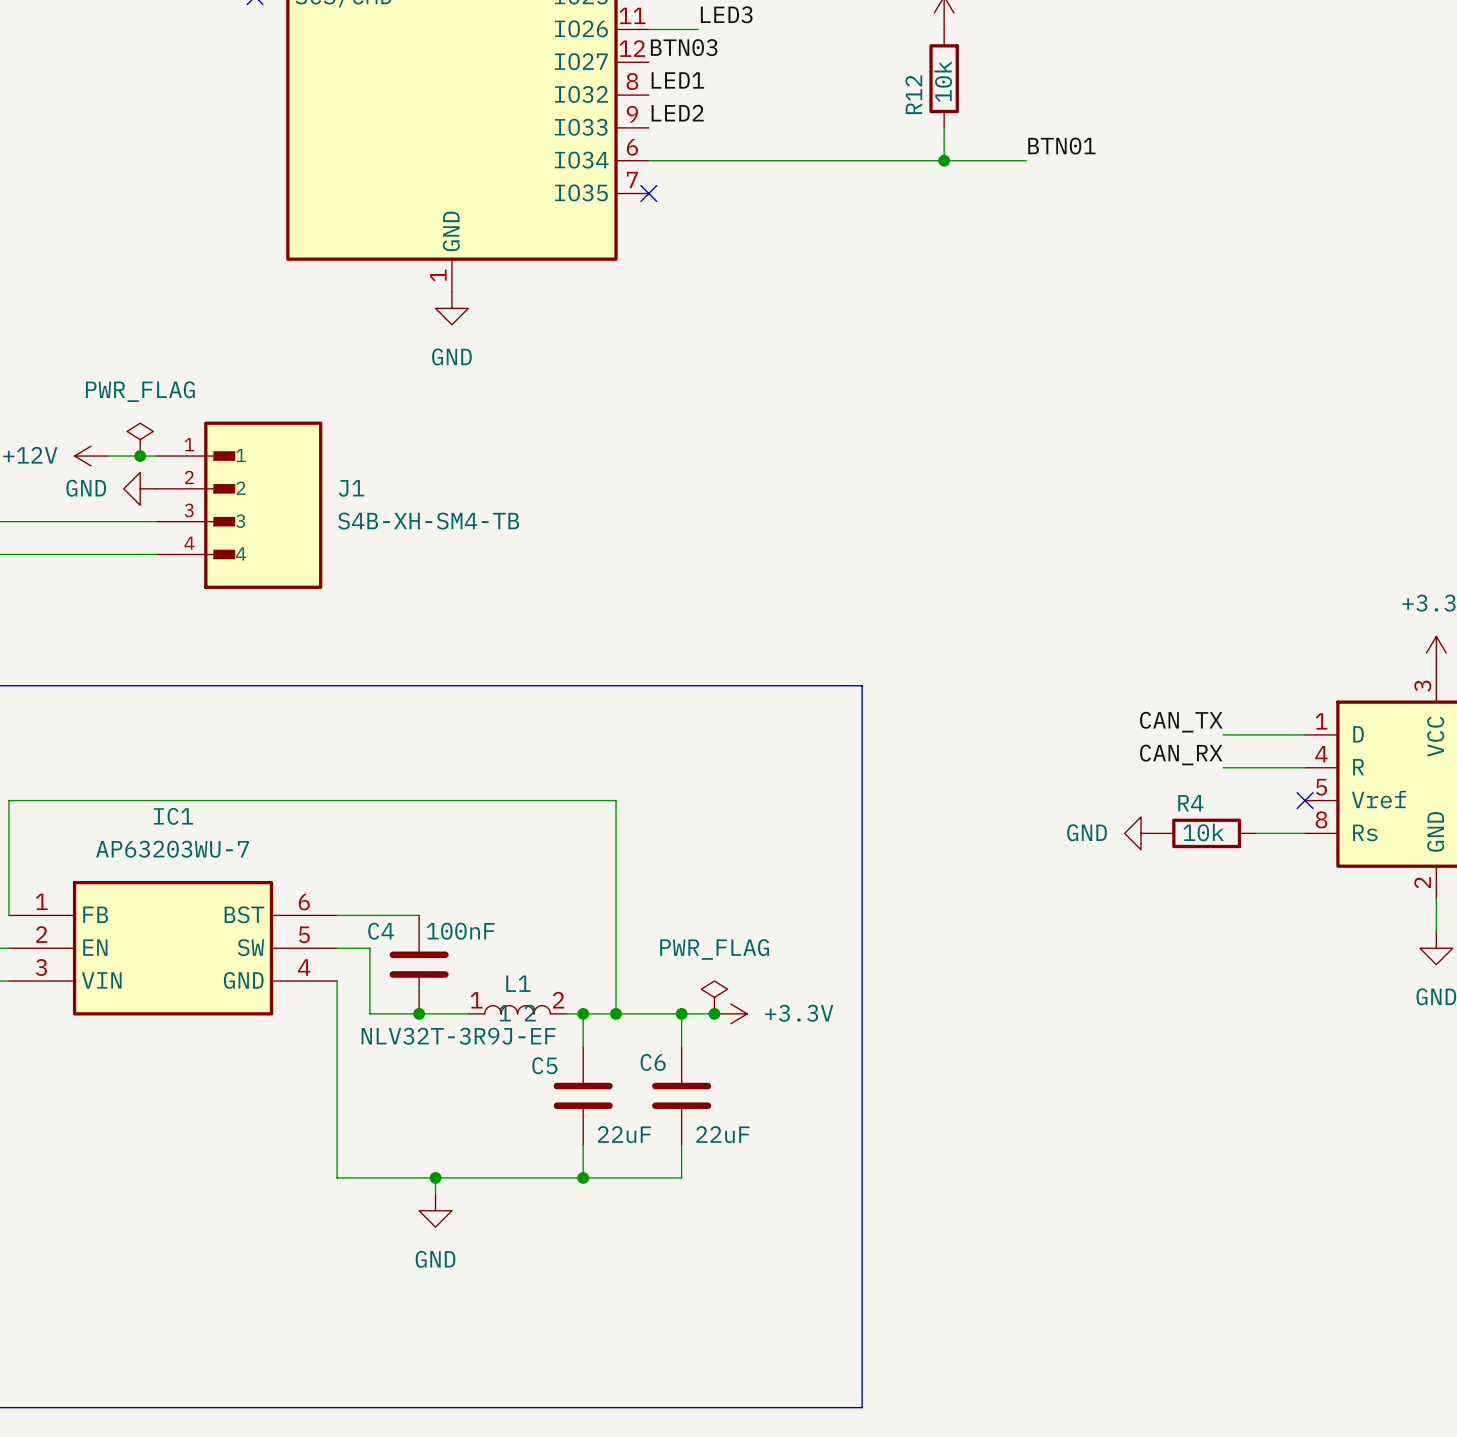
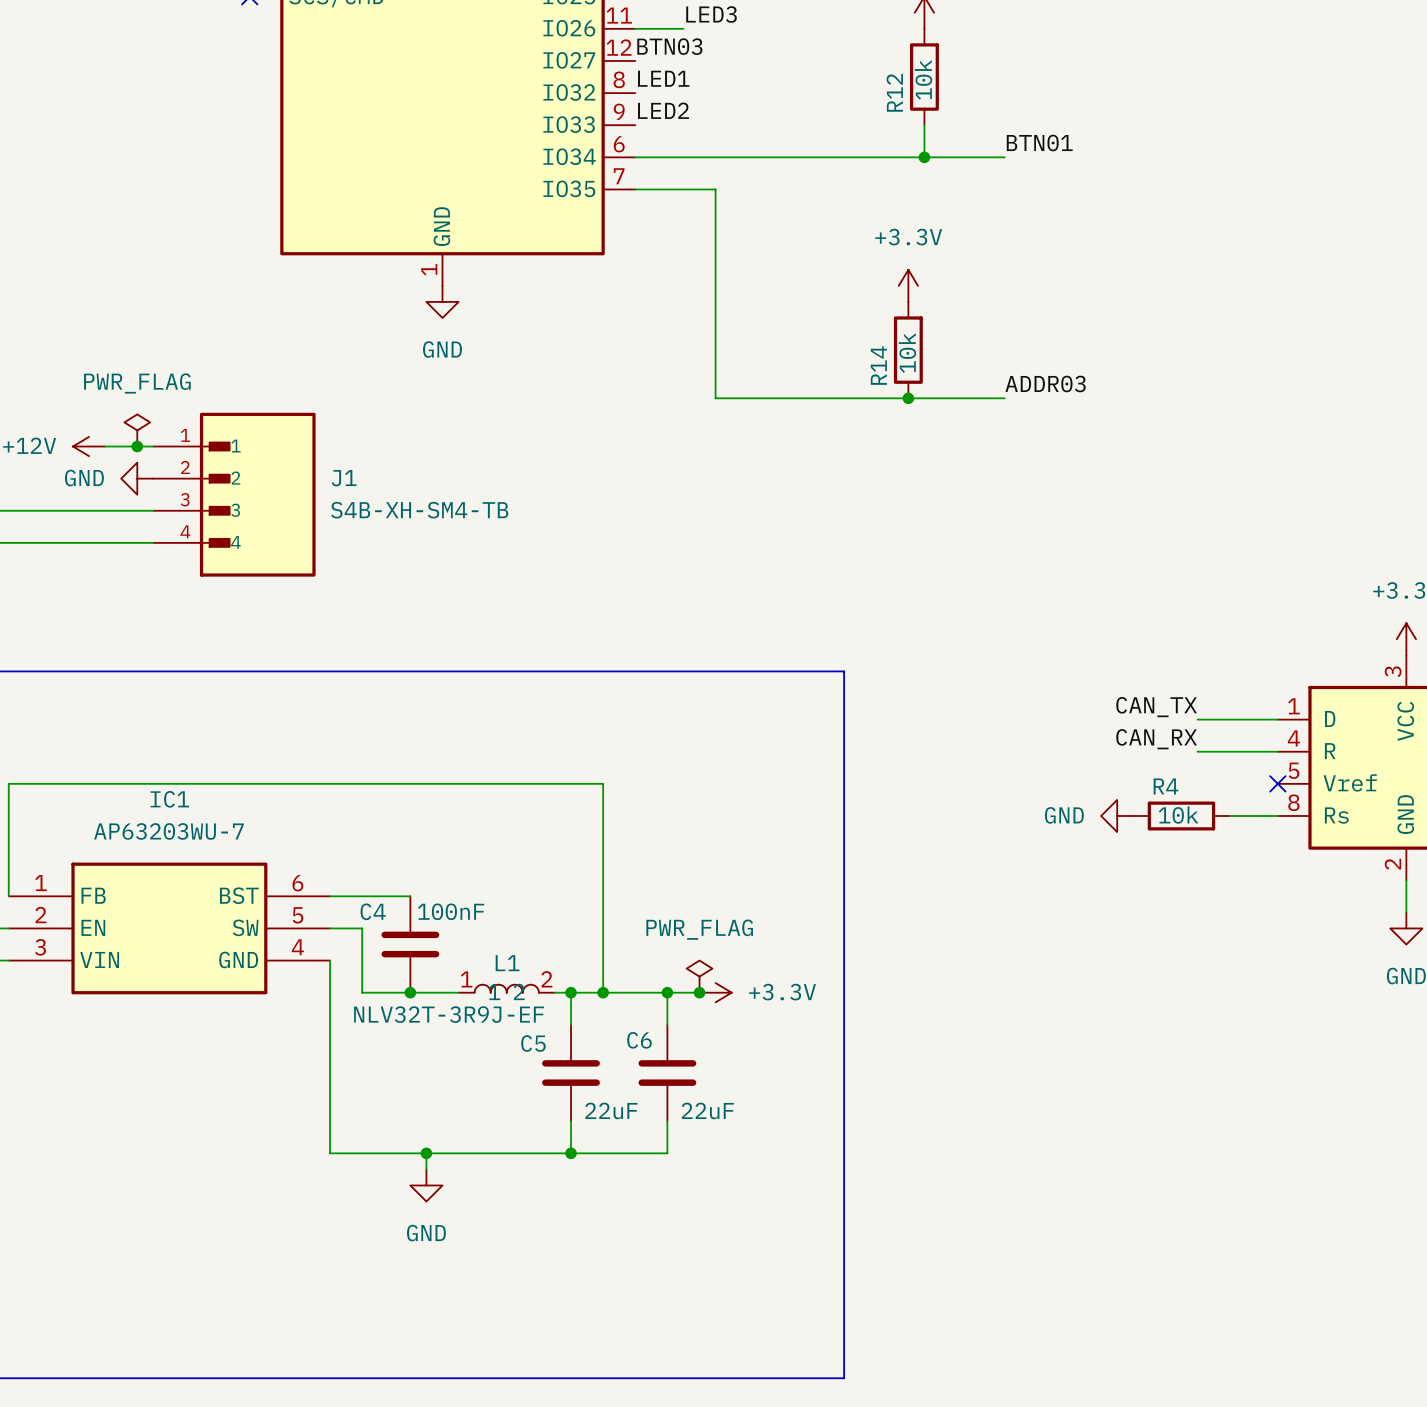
wire: none -> (635, 189) (715, 189) (715, 398) (1004, 398)
no-connect mark: (648, 193) -> none
power symbol: none -> +3.3V (908, 285)
R14: none -> 10k (908, 350)
label: none -> ADDR03 (1045, 383)
junction: none -> (908, 398)

